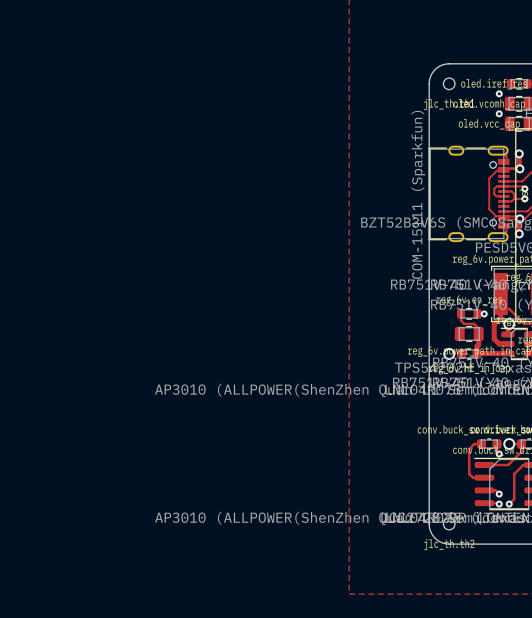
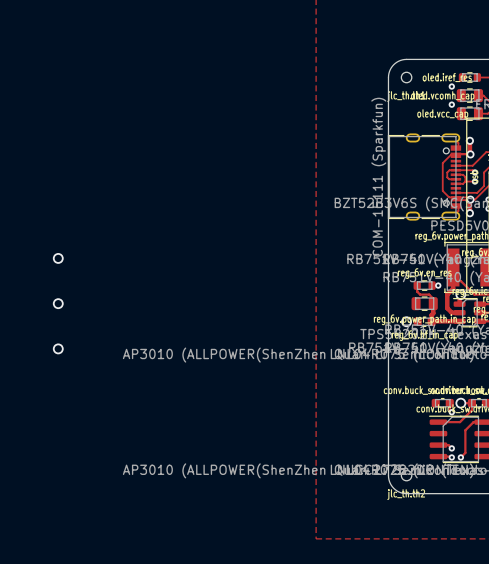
via: none -> (58, 258)
via: none -> (58, 303)
via: none -> (58, 348)
track: (481, 444) (474, 444) (469, 449) (469, 474) (472, 477) (484, 477) -> none

